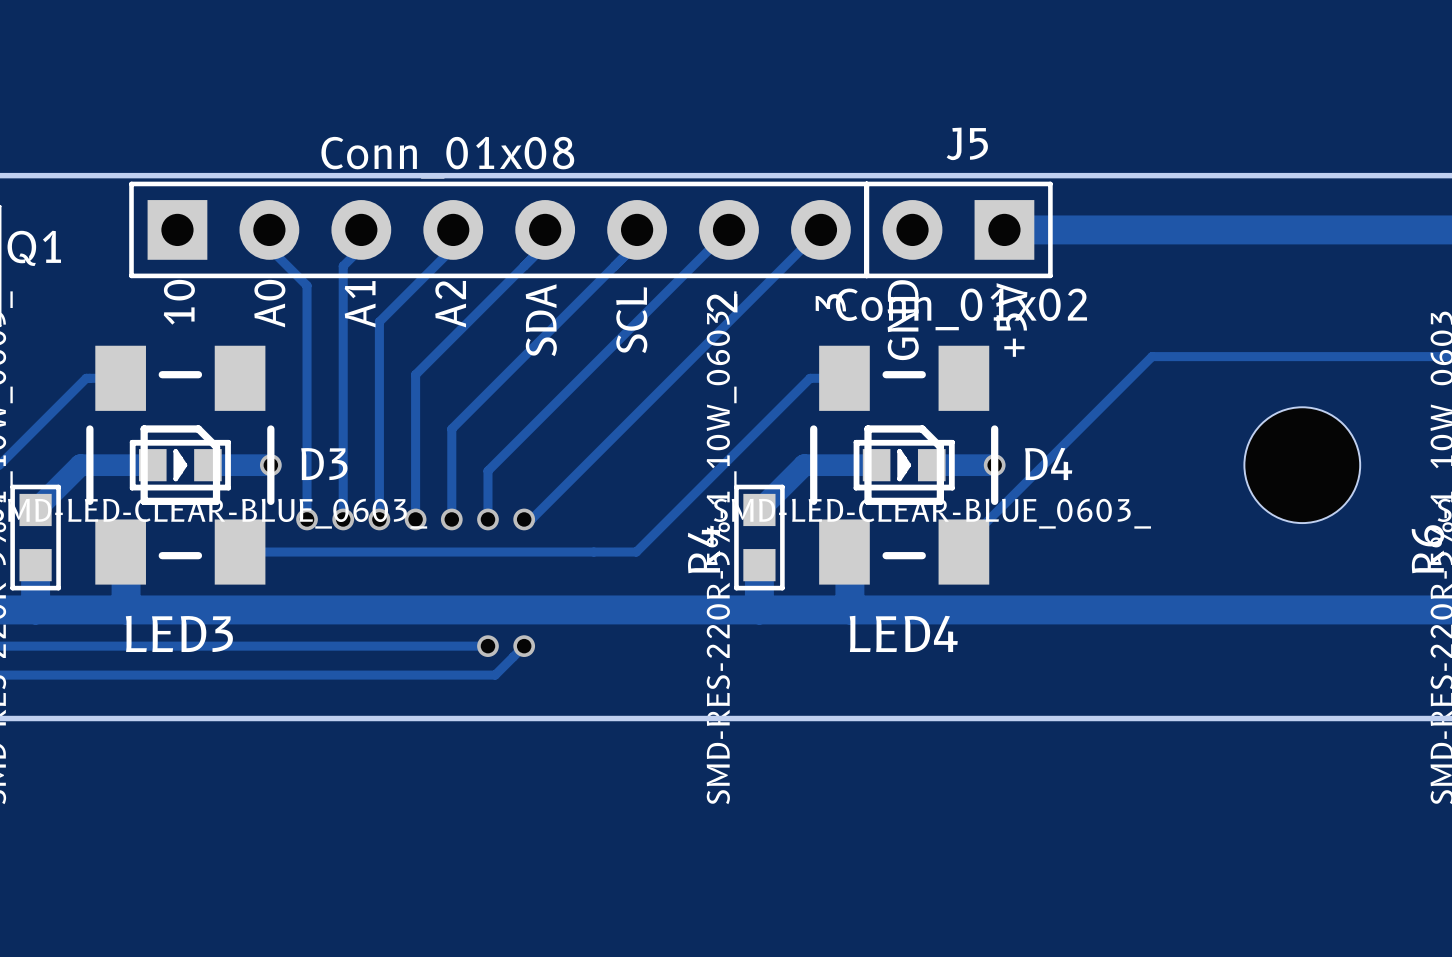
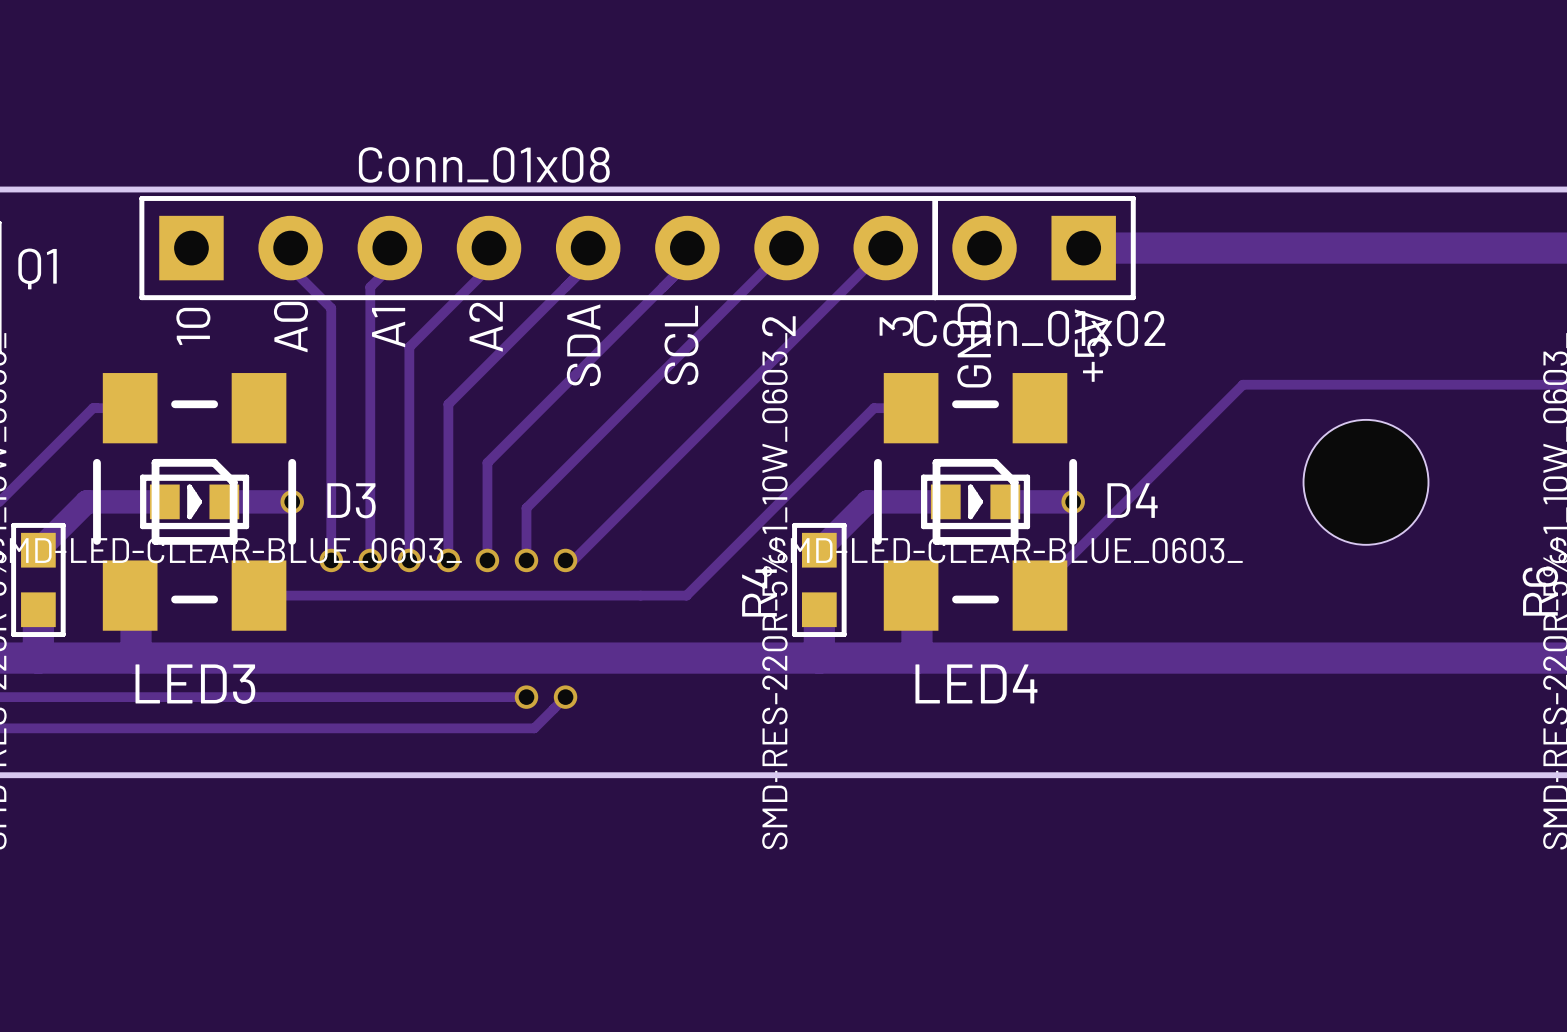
J5 name: J5 (967, 143) -> none
part position: (1302, 465) -> (1366, 482)

